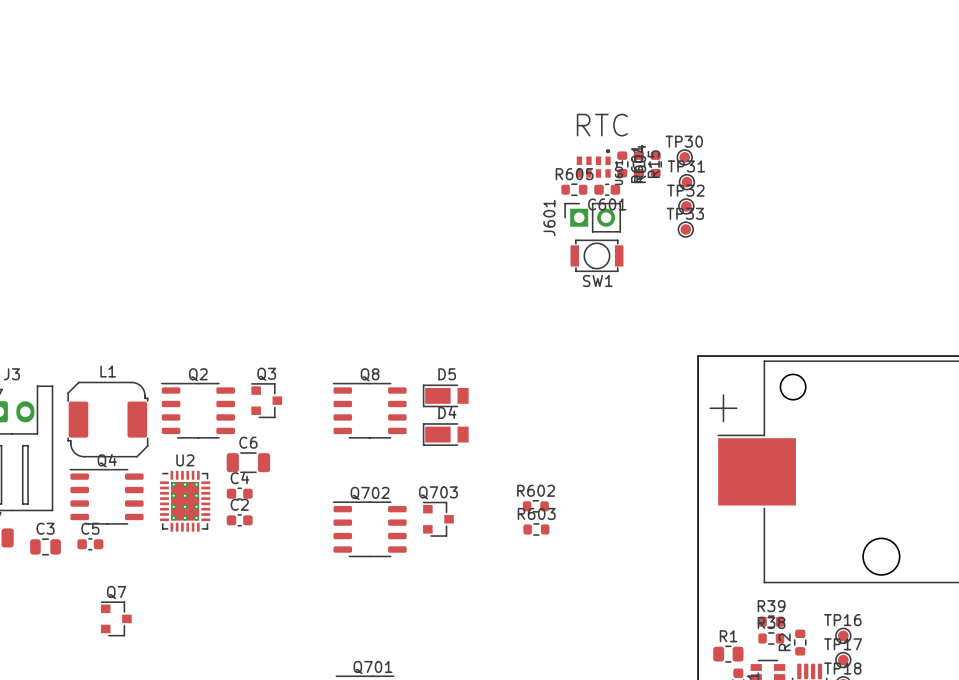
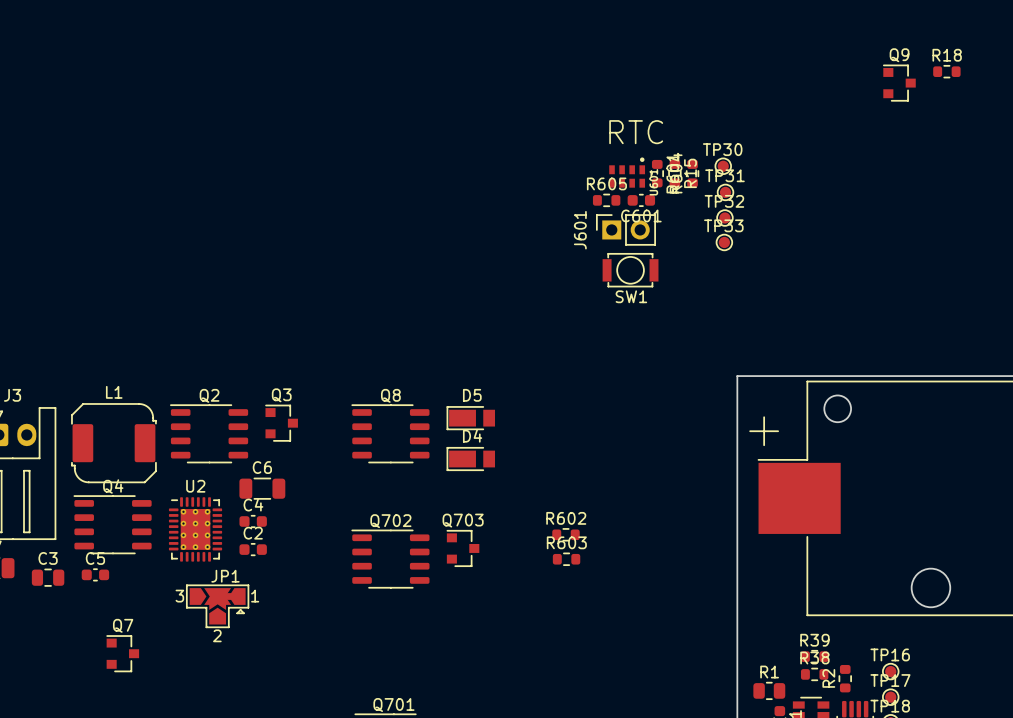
R18: none -> (946, 71)
Q9: none -> (899, 83)
JP1: none -> (217, 606)

